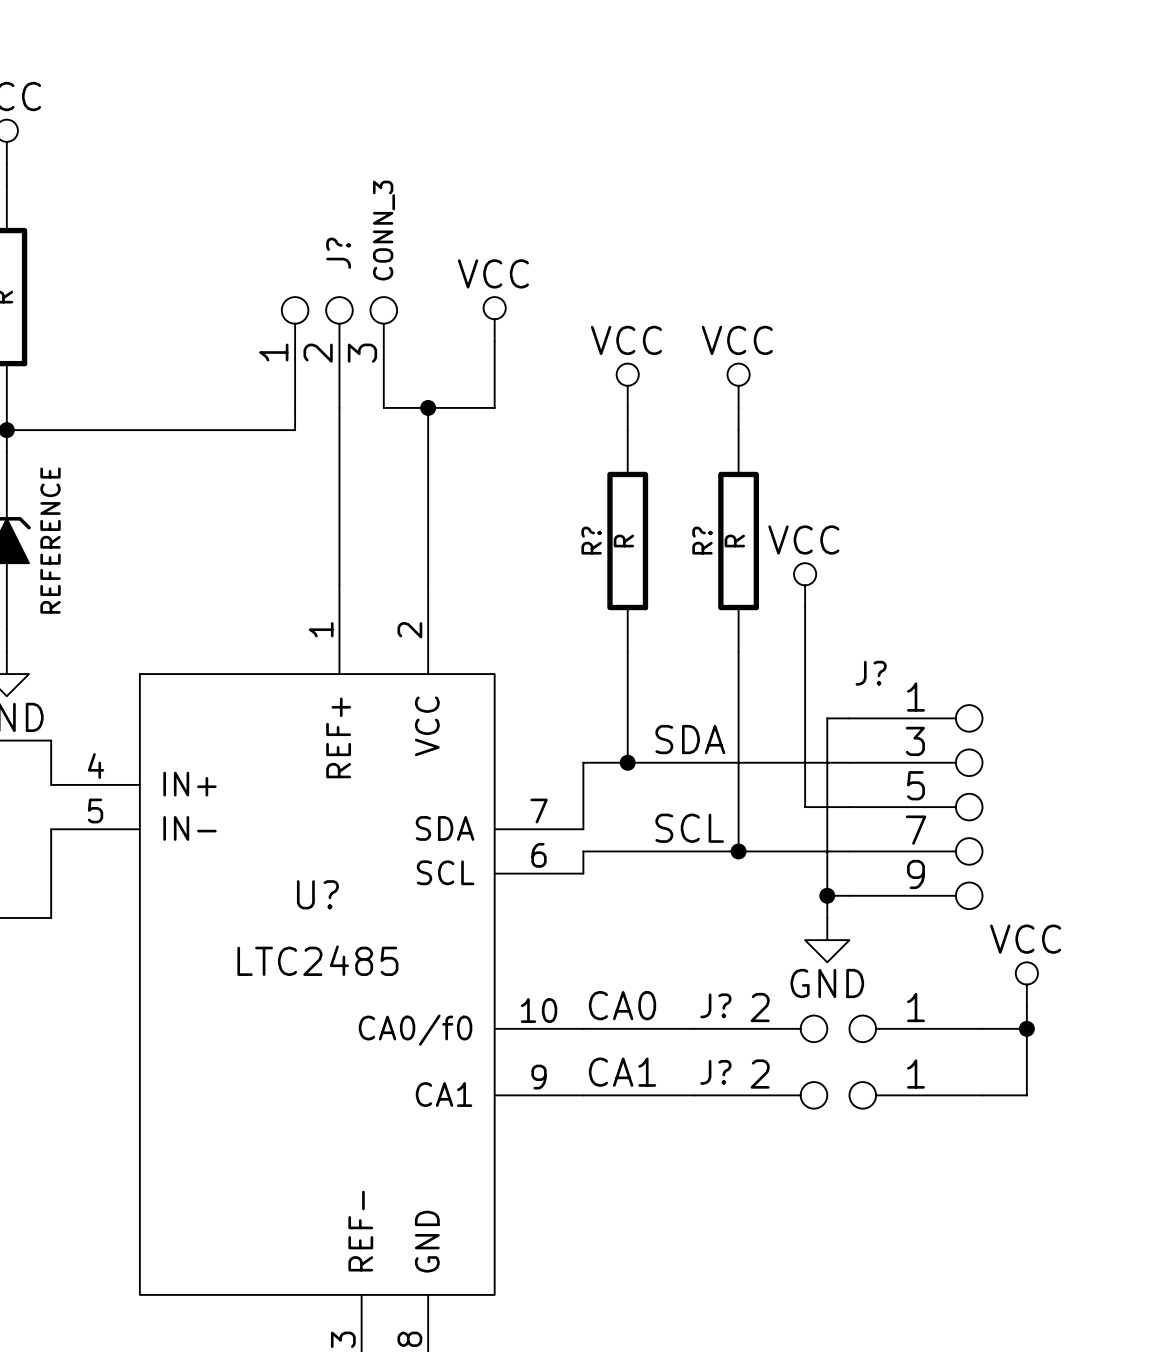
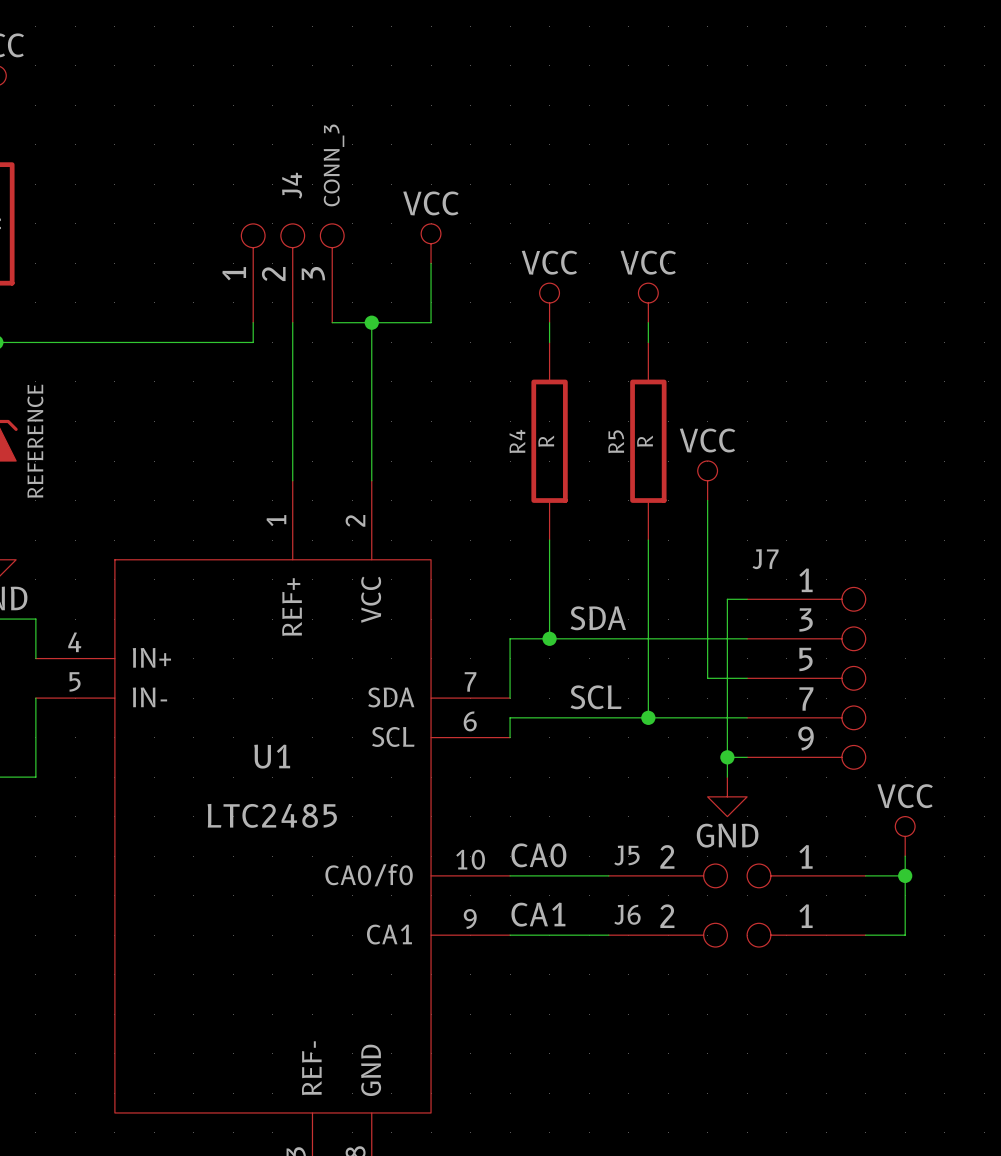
J? name: J? (338, 253) -> J4 (292, 185)
R? name: R? (591, 540) -> R4 (517, 441)
R? name: R? (702, 540) -> R5 (616, 441)
J? name: J? (871, 673) -> J7 (765, 559)
U? name: U? (317, 894) -> U1 (272, 756)
J? name: J? (715, 1005) -> J5 (626, 855)
J? name: J? (715, 1072) -> J6 (627, 914)

